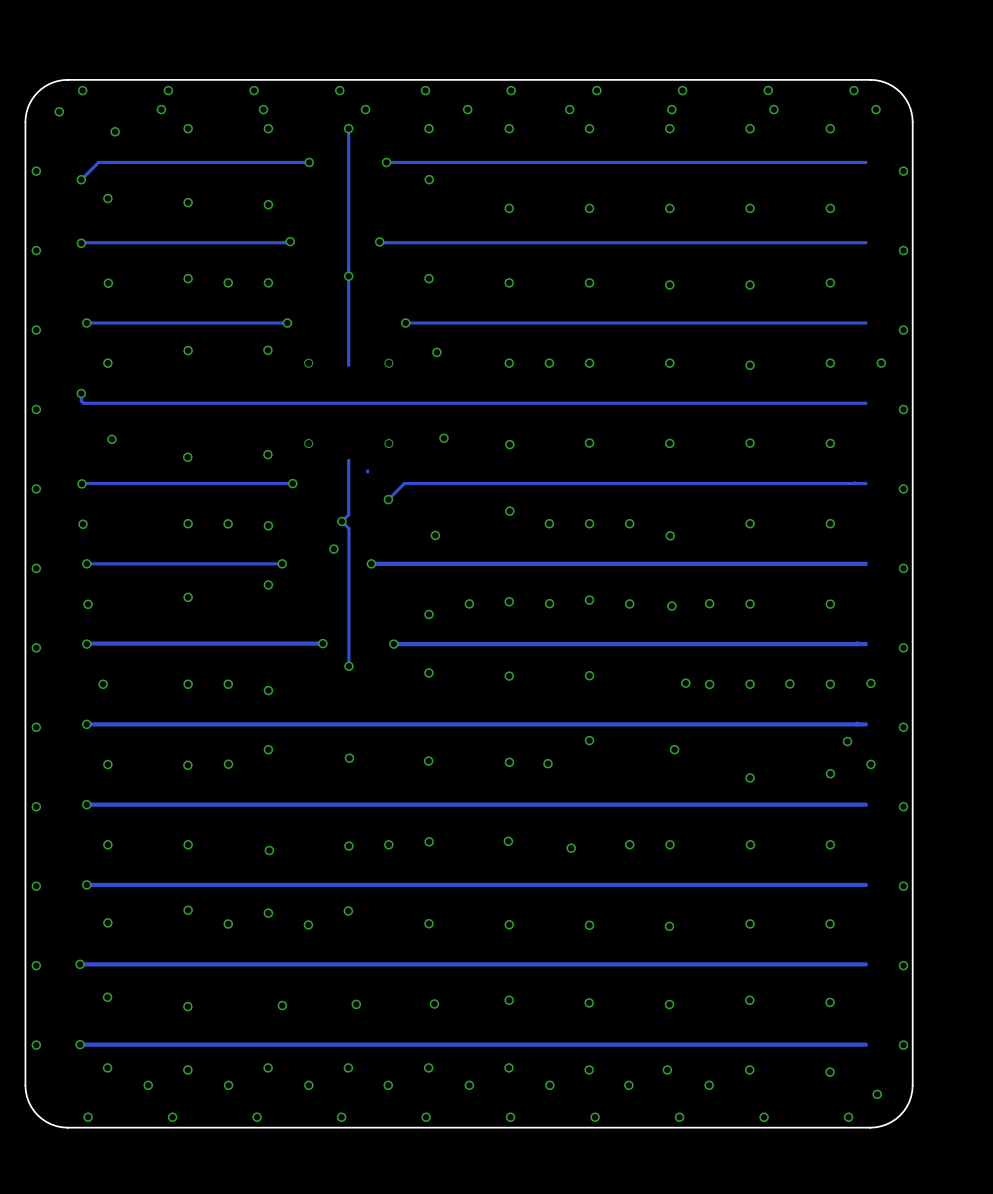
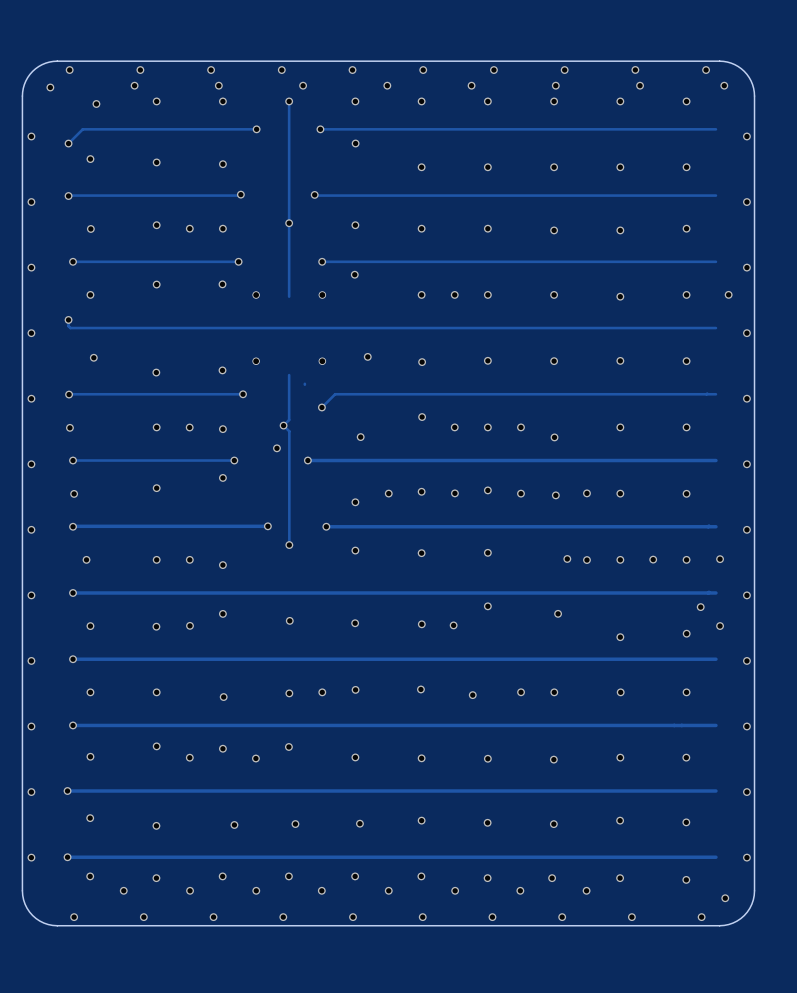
via: none -> (322, 261)
track: none -> (336, 261) (322, 261)
via: (405, 323) -> none
via: none -> (354, 274)
via: (436, 352) -> none

